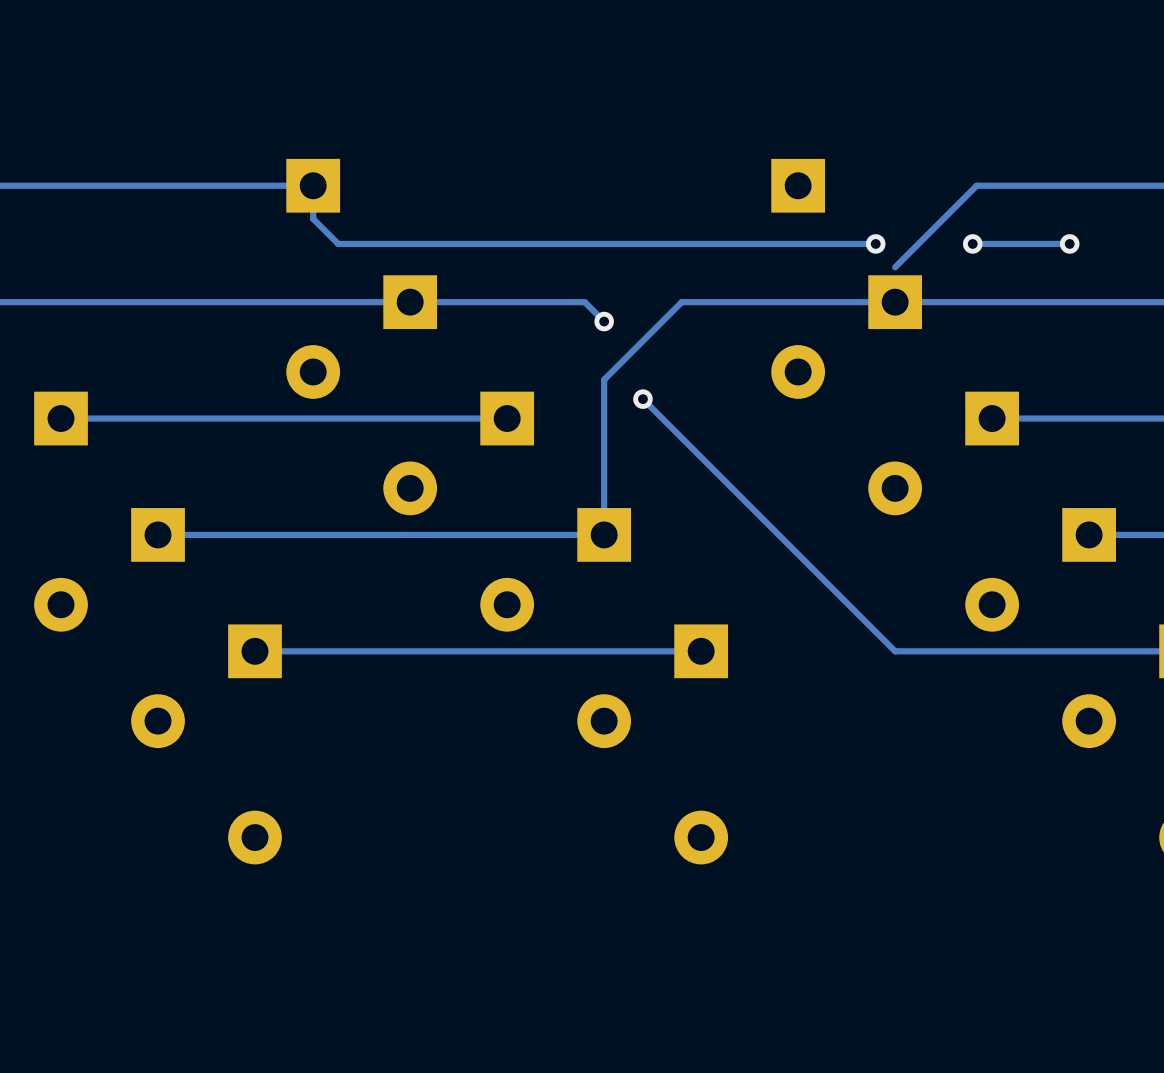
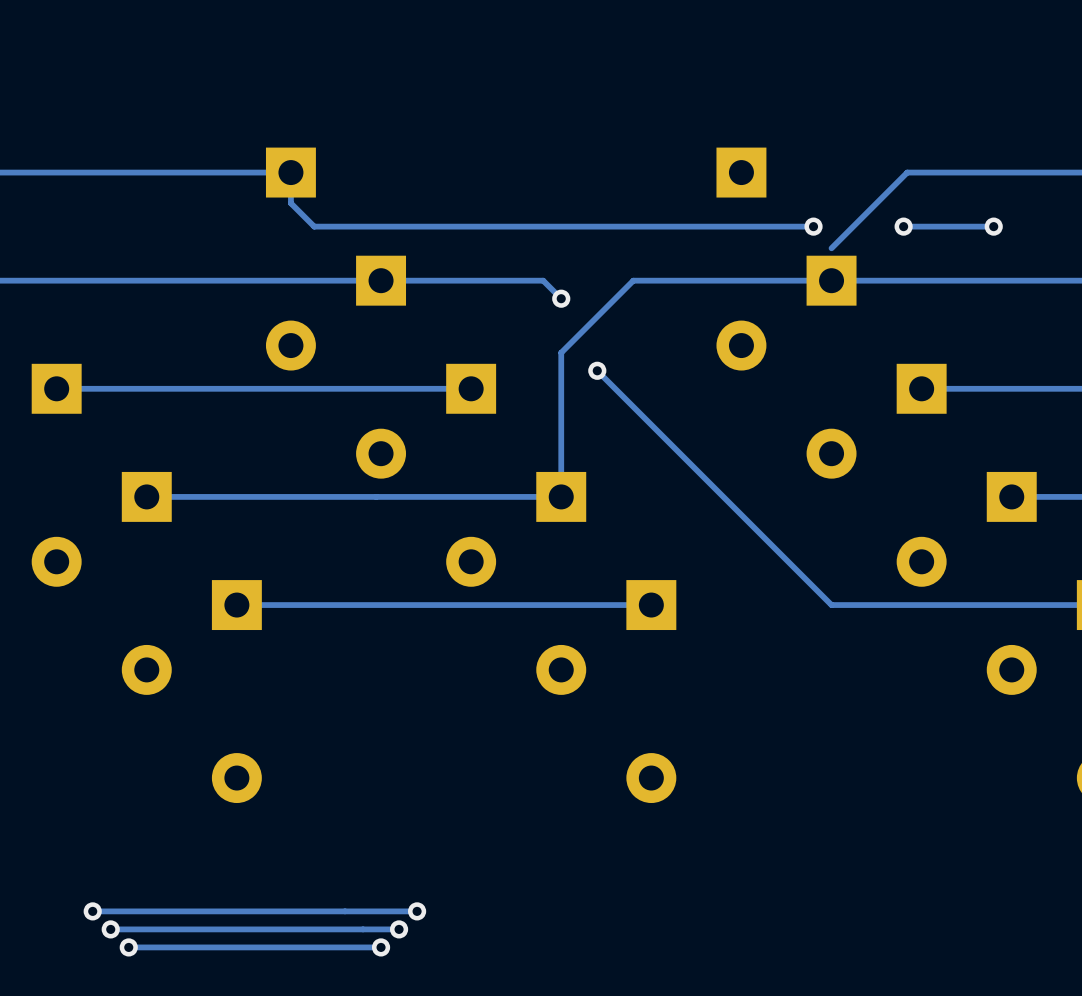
via: none -> (92, 911)
track: none -> (417, 911) (92, 911)
via: none -> (417, 911)
via: none -> (110, 929)
track: none -> (399, 929) (110, 929)
via: none -> (399, 929)
via: none -> (128, 947)
track: none -> (381, 947) (128, 947)
via: none -> (381, 947)

